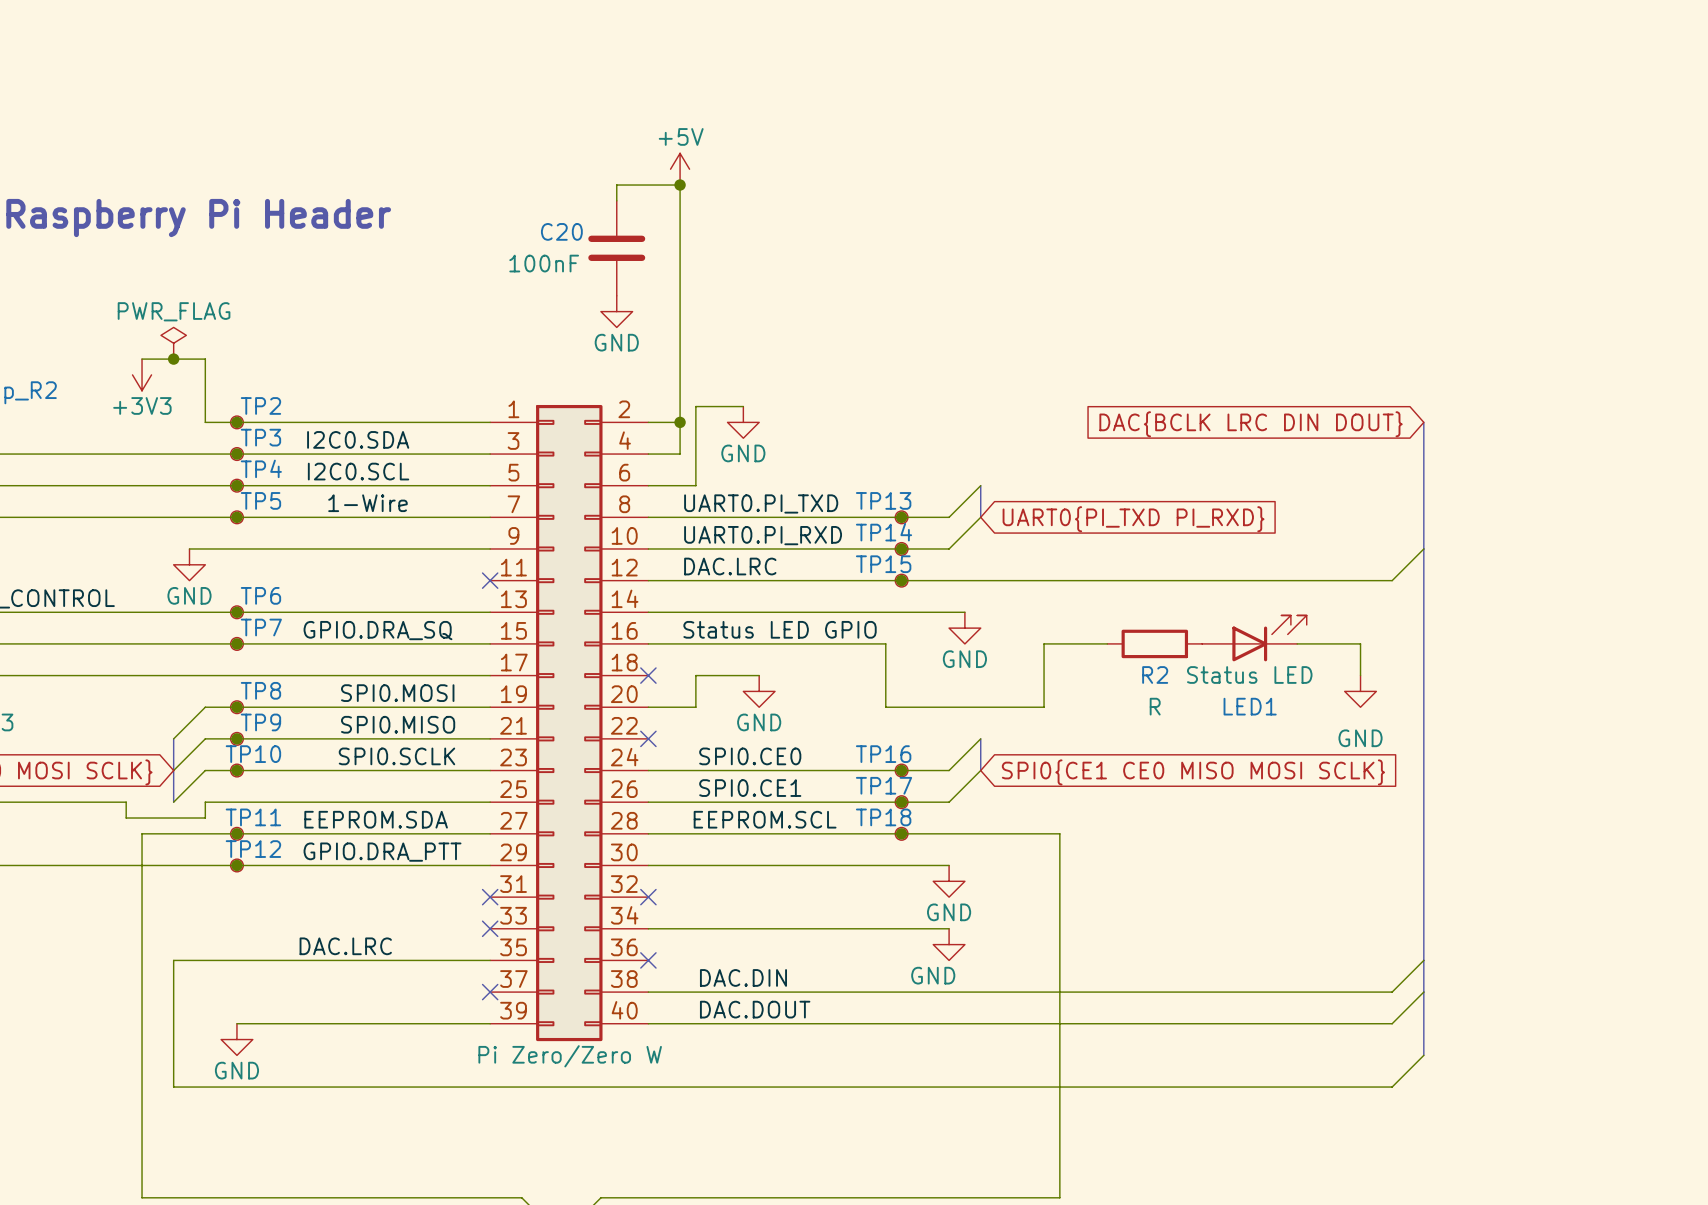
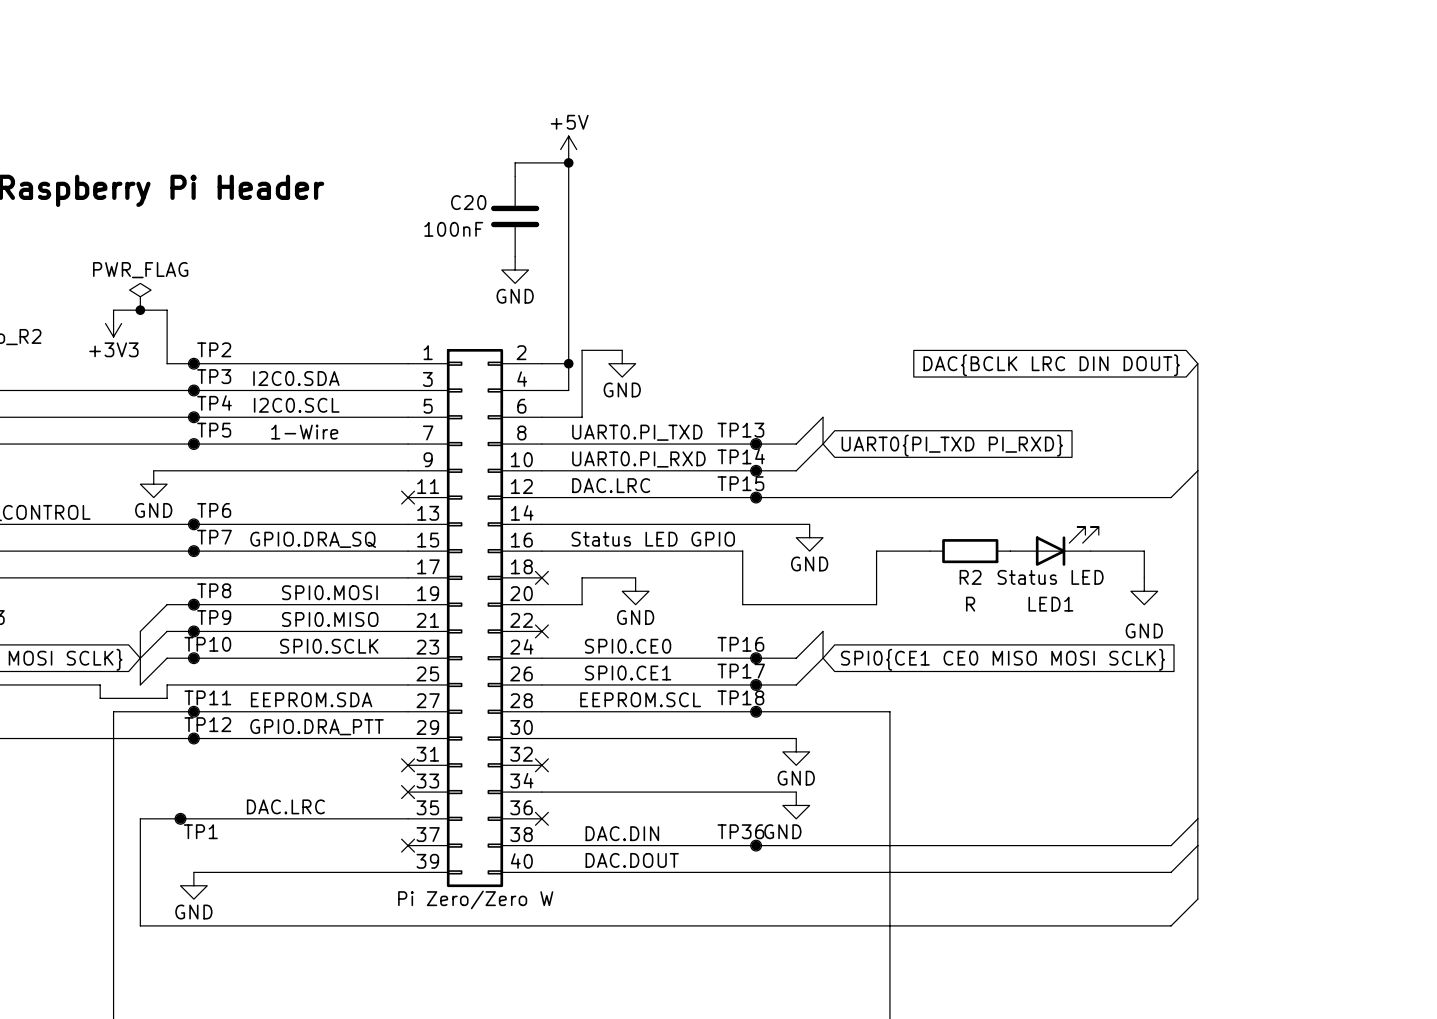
junction: none -> (180, 818)
TP1: none -> (180, 818)
junction: none -> (756, 845)
TP36: none -> (756, 845)

